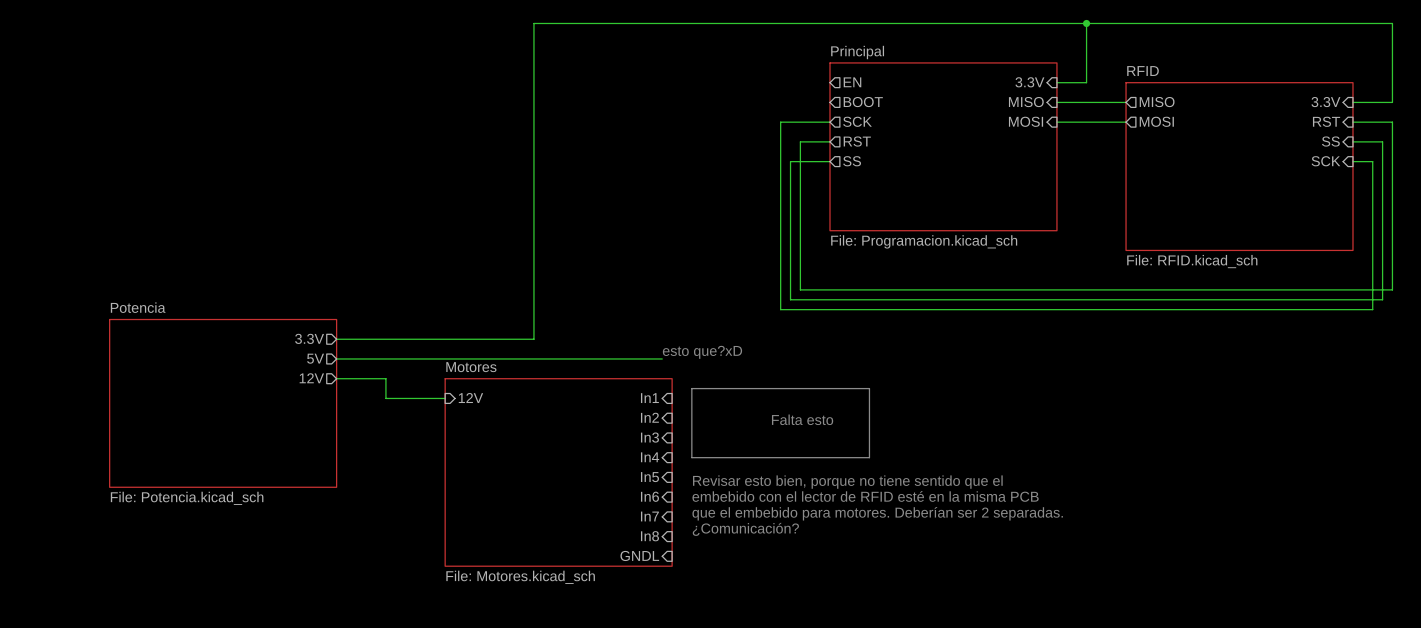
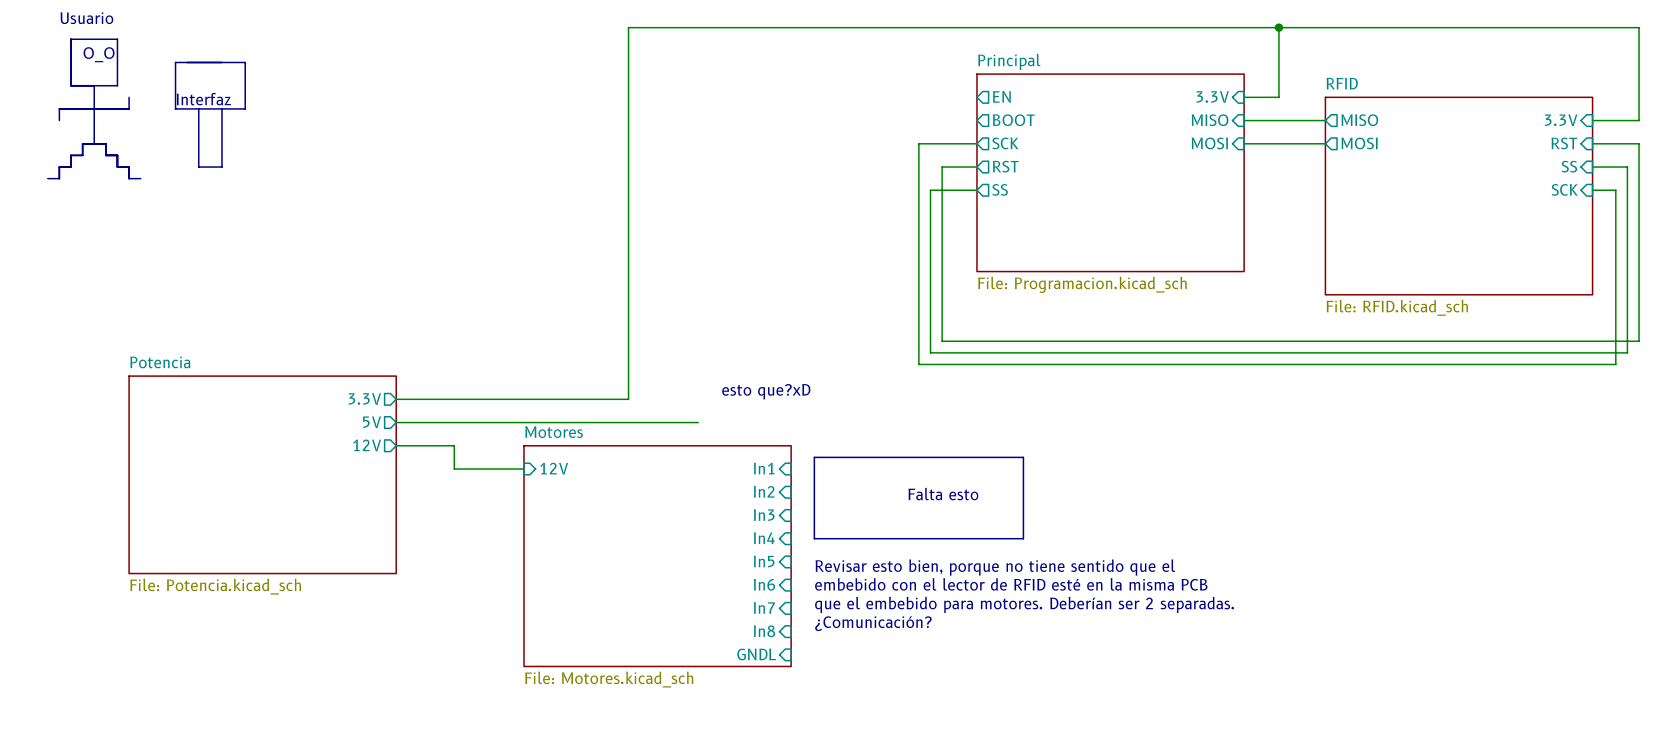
text: none -> Usuario (86, 18)
line: none -> (71, 39) (71, 85) (117, 85) (117, 39) (71, 39)
text: none -> O_O (99, 54)
line: none -> (175, 62) (175, 108) (245, 108) (245, 62) (175, 62)
line: none -> (94, 85) (94, 143)
line: none -> (129, 97) (129, 108) (59, 108) (59, 120)
text: none -> Interfaz (203, 99)
line: none -> (198, 108) (198, 167) (221, 167) (221, 108)
line: none -> (47, 178) (59, 178) (59, 167) (71, 167) (71, 155) (82, 155) (82, 143) (105, 143) (105, 155) (117, 155) (117, 167) (129, 167) (129, 178) (140, 178)
text position: esto que?xD (702, 352) -> esto que?xD (766, 391)
wire: (593, 358) (662, 358) -> none

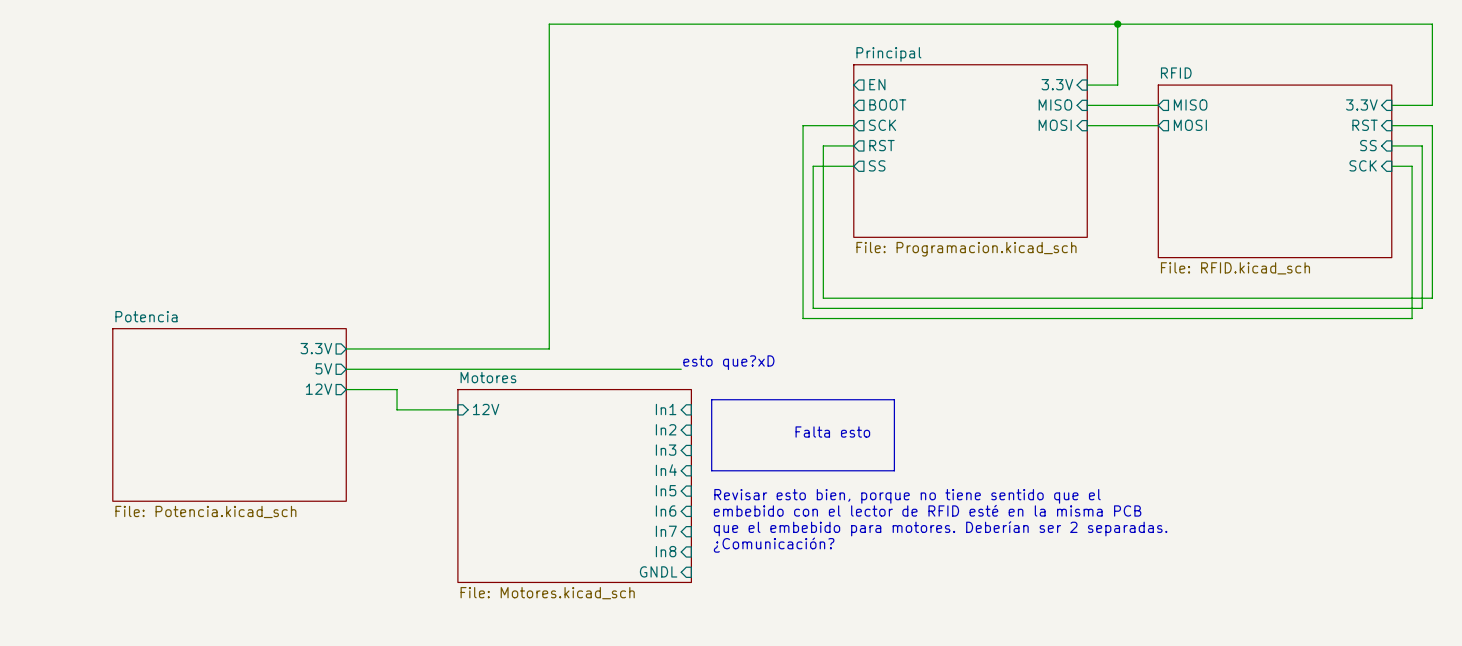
text: Usuario (86, 18) -> none
line: (71, 39) (71, 85) (117, 85) (117, 39) (71, 39) -> none
text: O_O (99, 54) -> none
line: (175, 62) (175, 108) (245, 108) (245, 62) (175, 62) -> none
line: (94, 85) (94, 143) -> none
line: (129, 97) (129, 108) (59, 108) (59, 120) -> none
text: Interfaz (203, 99) -> none
line: (198, 108) (198, 167) (221, 167) (221, 108) -> none
line: (47, 178) (59, 178) (59, 167) (71, 167) (71, 155) (82, 155) (82, 143) (105, 143) (105, 155) (117, 155) (117, 167) (129, 167) (129, 178) (140, 178) -> none
text position: esto que?xD (766, 391) -> esto que?xD (728, 362)
wire: none -> (610, 369) (681, 369)

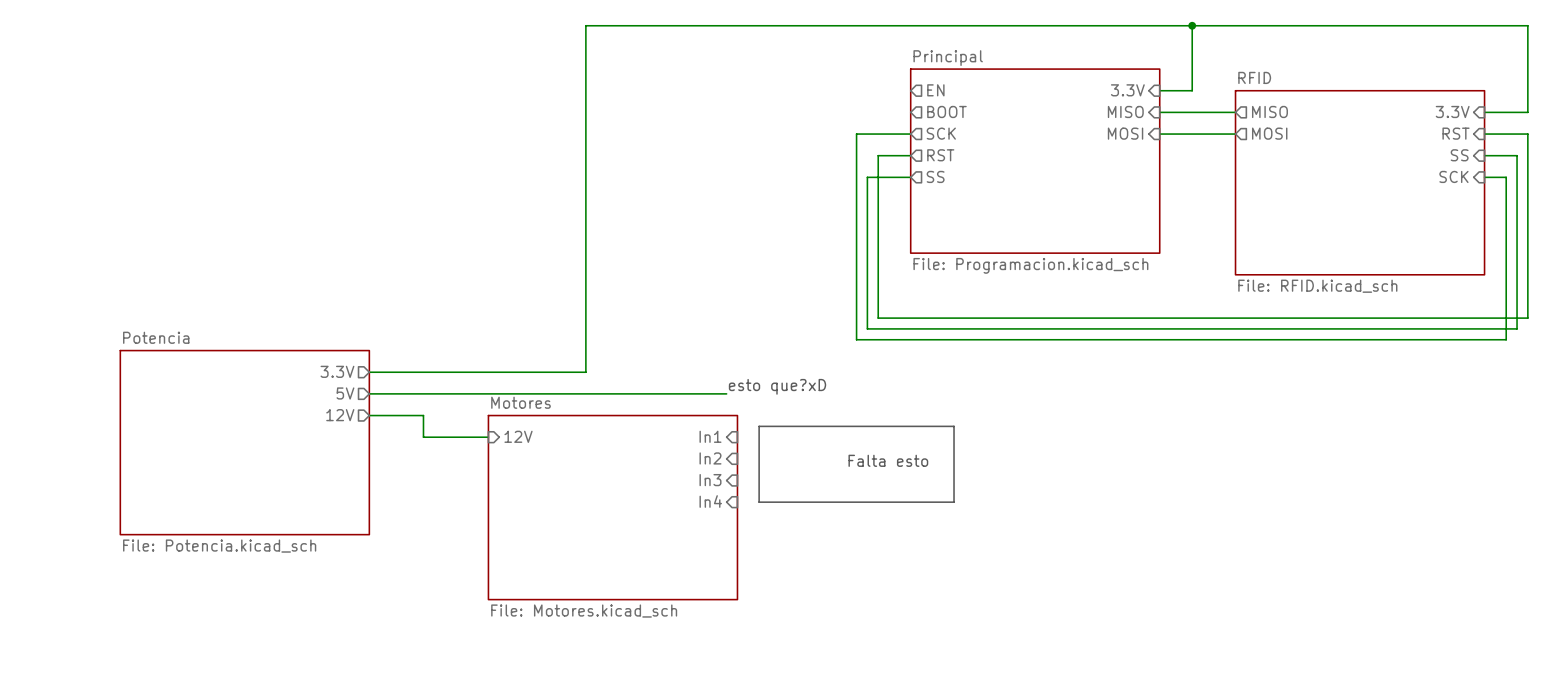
sheet Motores: none -> File: Motores.kicad_sch (612, 507)
sheet Motores: File: Motores.kicad_sch (574, 486) -> none
sheet pin: In5 (666, 490) -> none
text: Revisar esto bien, porque no tiene sentido que el (907, 496) -> none
text: embebido con el lector de RFID esté en la misma PCB (927, 510) -> none
sheet pin: In6 (666, 511) -> none
text: que el embebido para motores. Deberían ser 2 separadas. (940, 528) -> none
sheet pin: In7 (666, 531) -> none
text: ¿Comunicación? (774, 545) -> none
sheet pin: In8 (666, 551) -> none
sheet pin: GNDL (658, 571) -> none

